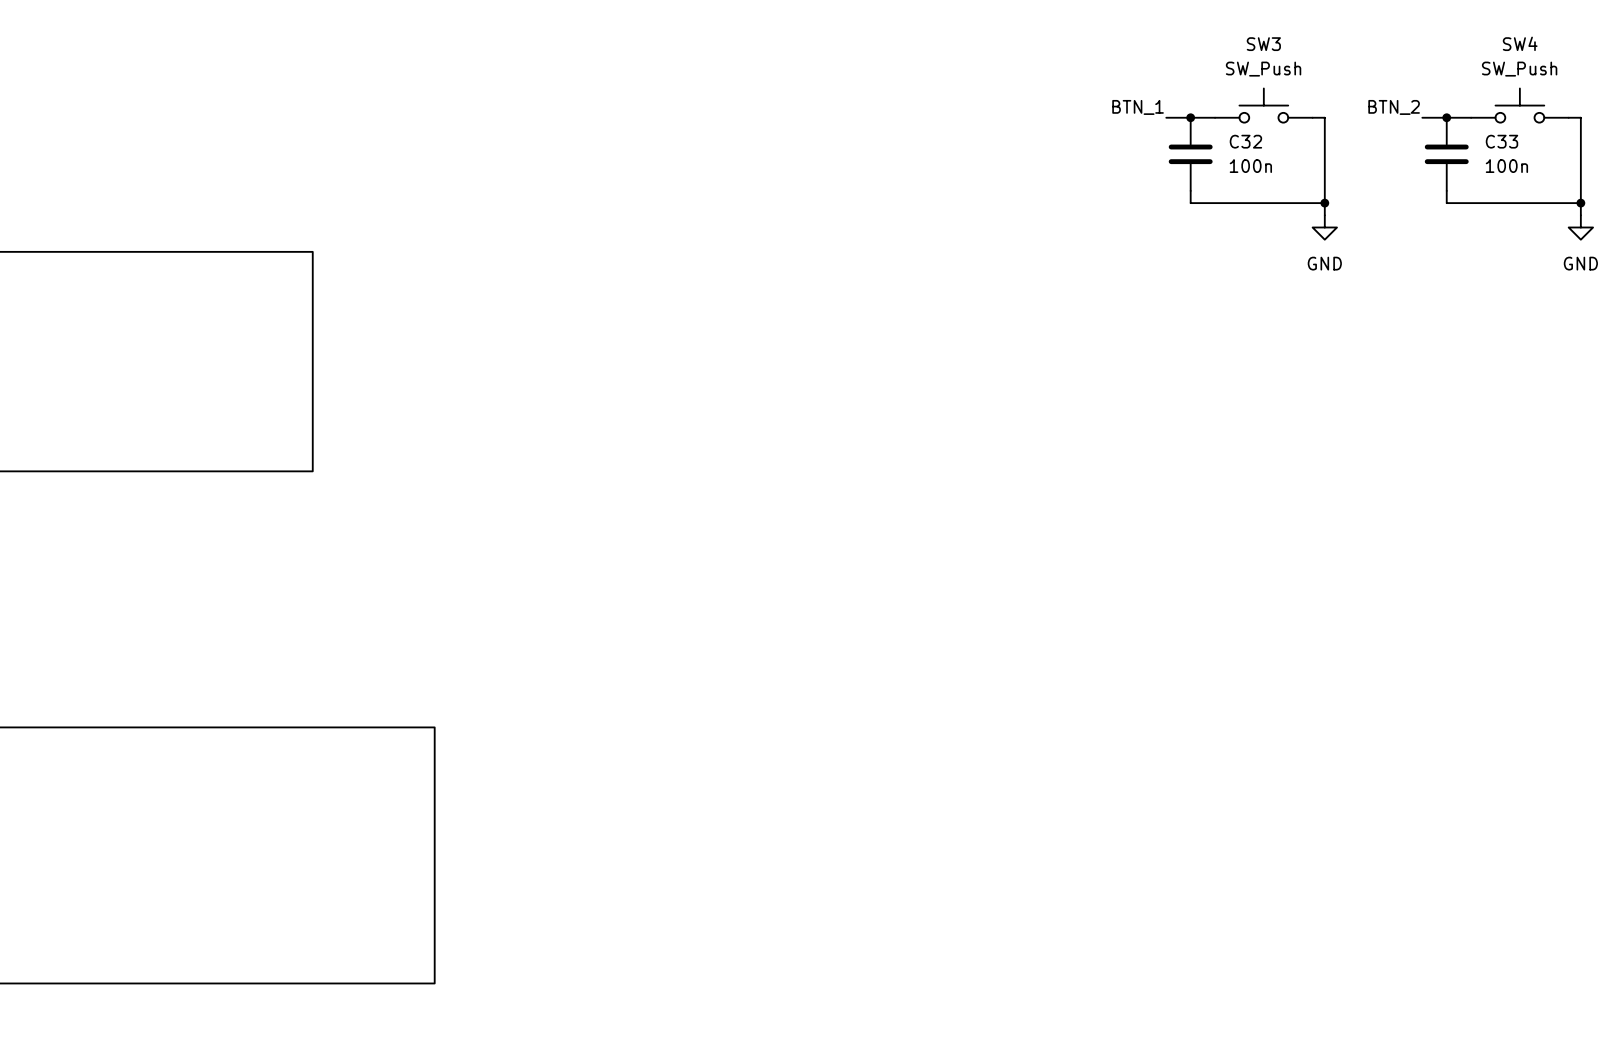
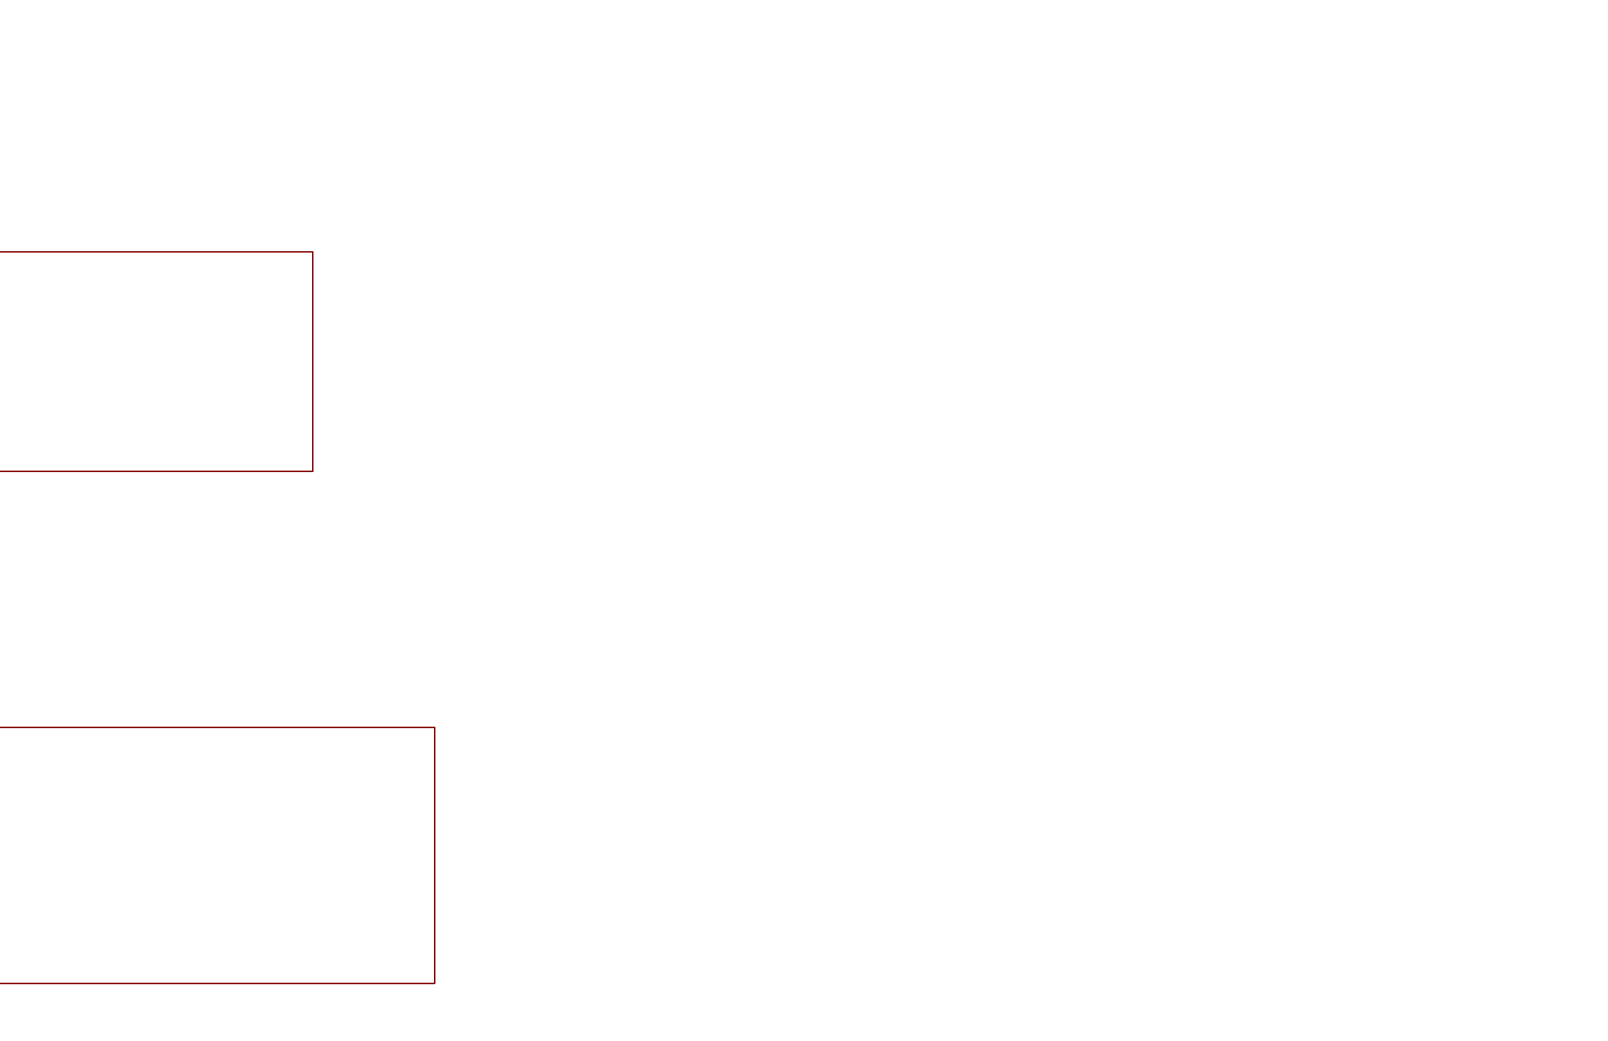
SW3: SW_Push (1263, 105) -> none
SW4: SW_Push (1519, 105) -> none
label: BTN_1 (1138, 107) -> none
label: BTN_2 (1394, 107) -> none
wire: (1166, 117) (1215, 117) -> none
junction: (1190, 117) -> none
wire: (1312, 117) (1324, 117) (1324, 215) -> none
wire: (1422, 117) (1471, 117) -> none
junction: (1446, 117) -> none
wire: (1568, 117) (1580, 117) (1580, 215) -> none
C32: 100n (1190, 154) -> none
C33: 100n (1446, 154) -> none
wire: (1190, 190) (1190, 203) (1324, 203) -> none
wire: (1446, 190) (1446, 203) (1580, 203) -> none
junction: (1324, 203) -> none
junction: (1580, 203) -> none
power symbol: GND (1324, 227) -> none
power symbol: GND (1580, 227) -> none

